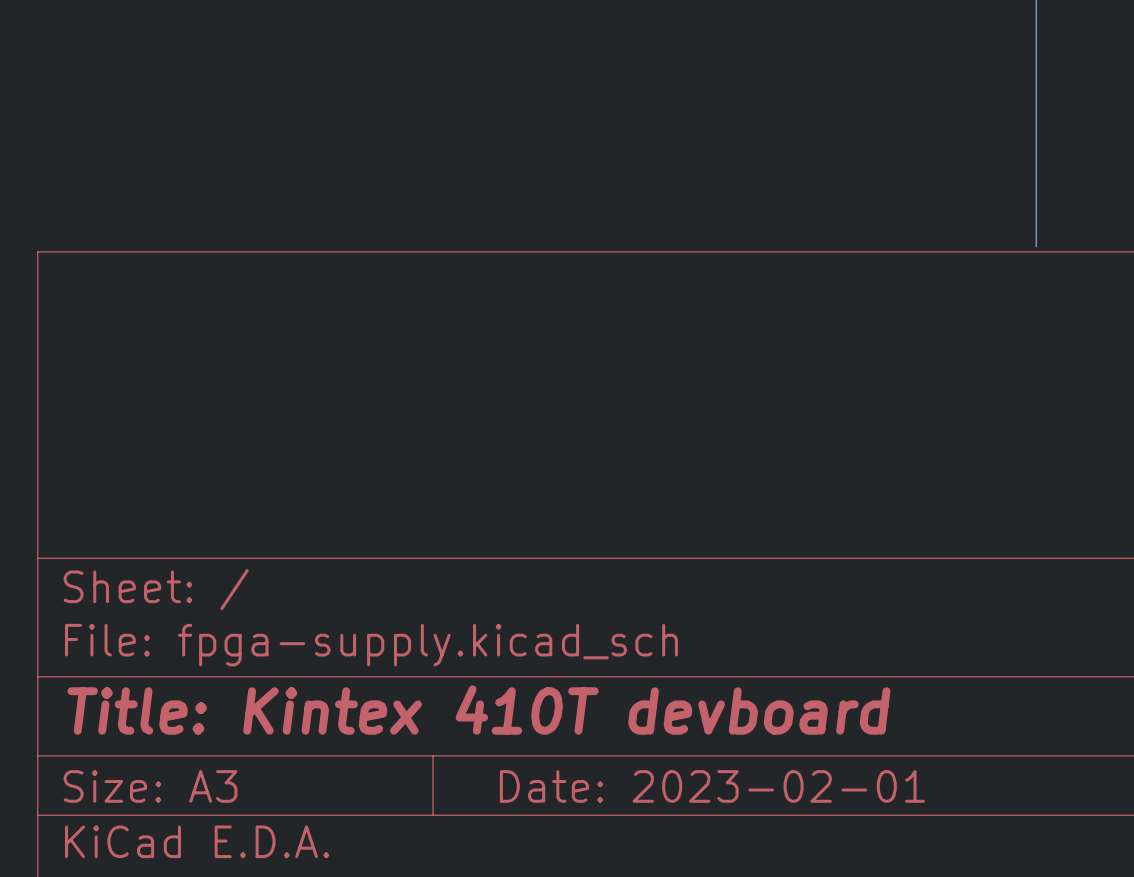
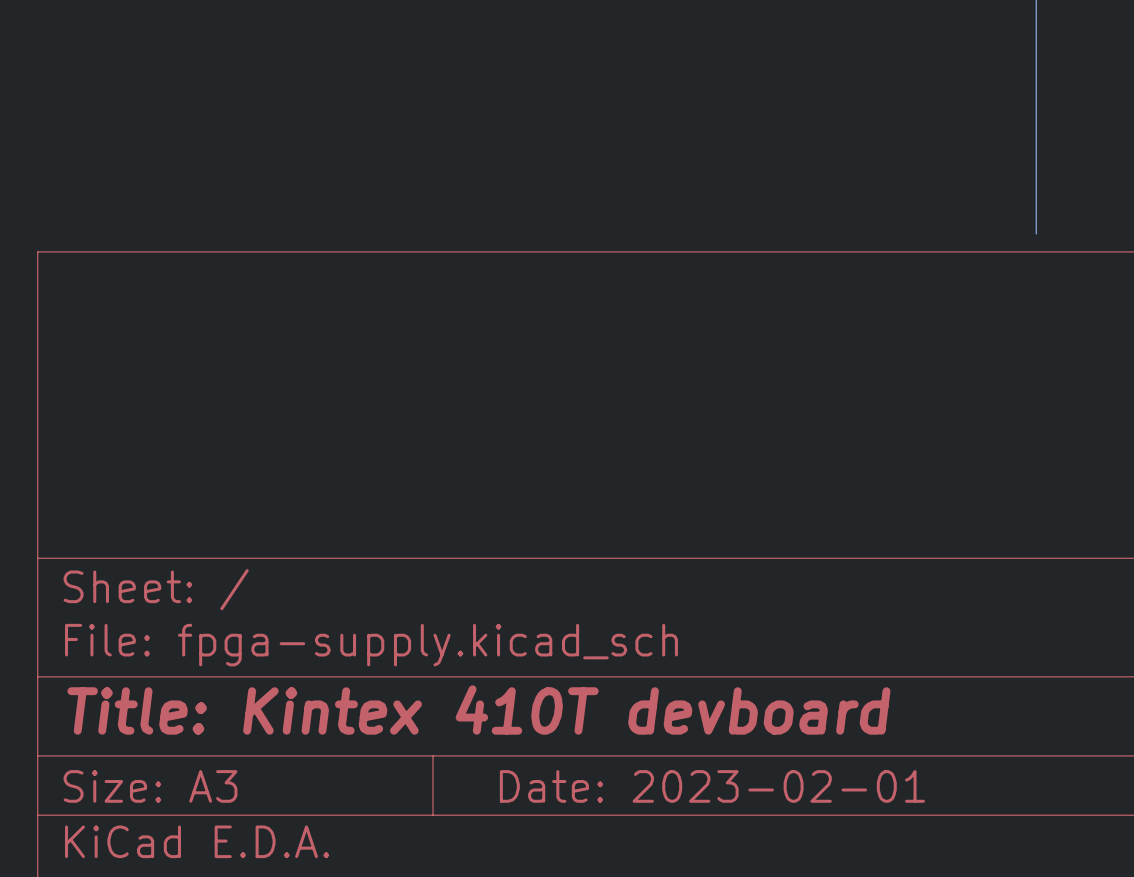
line: (1036, 234) (1036, 246) -> none

